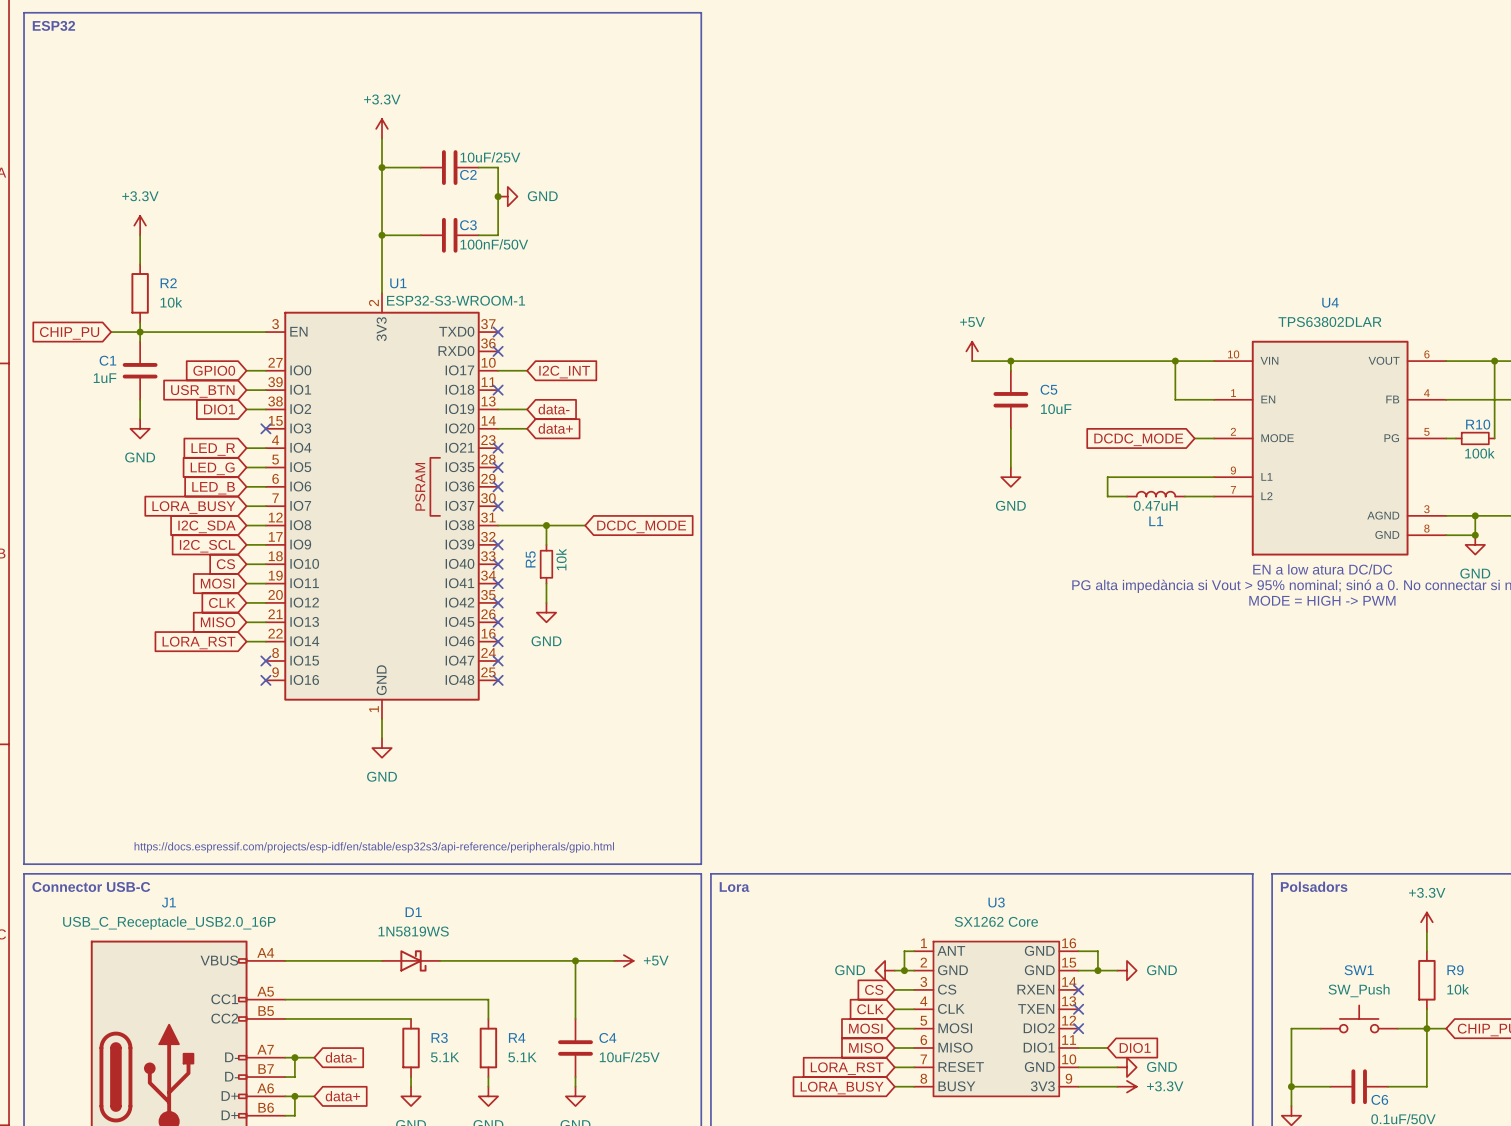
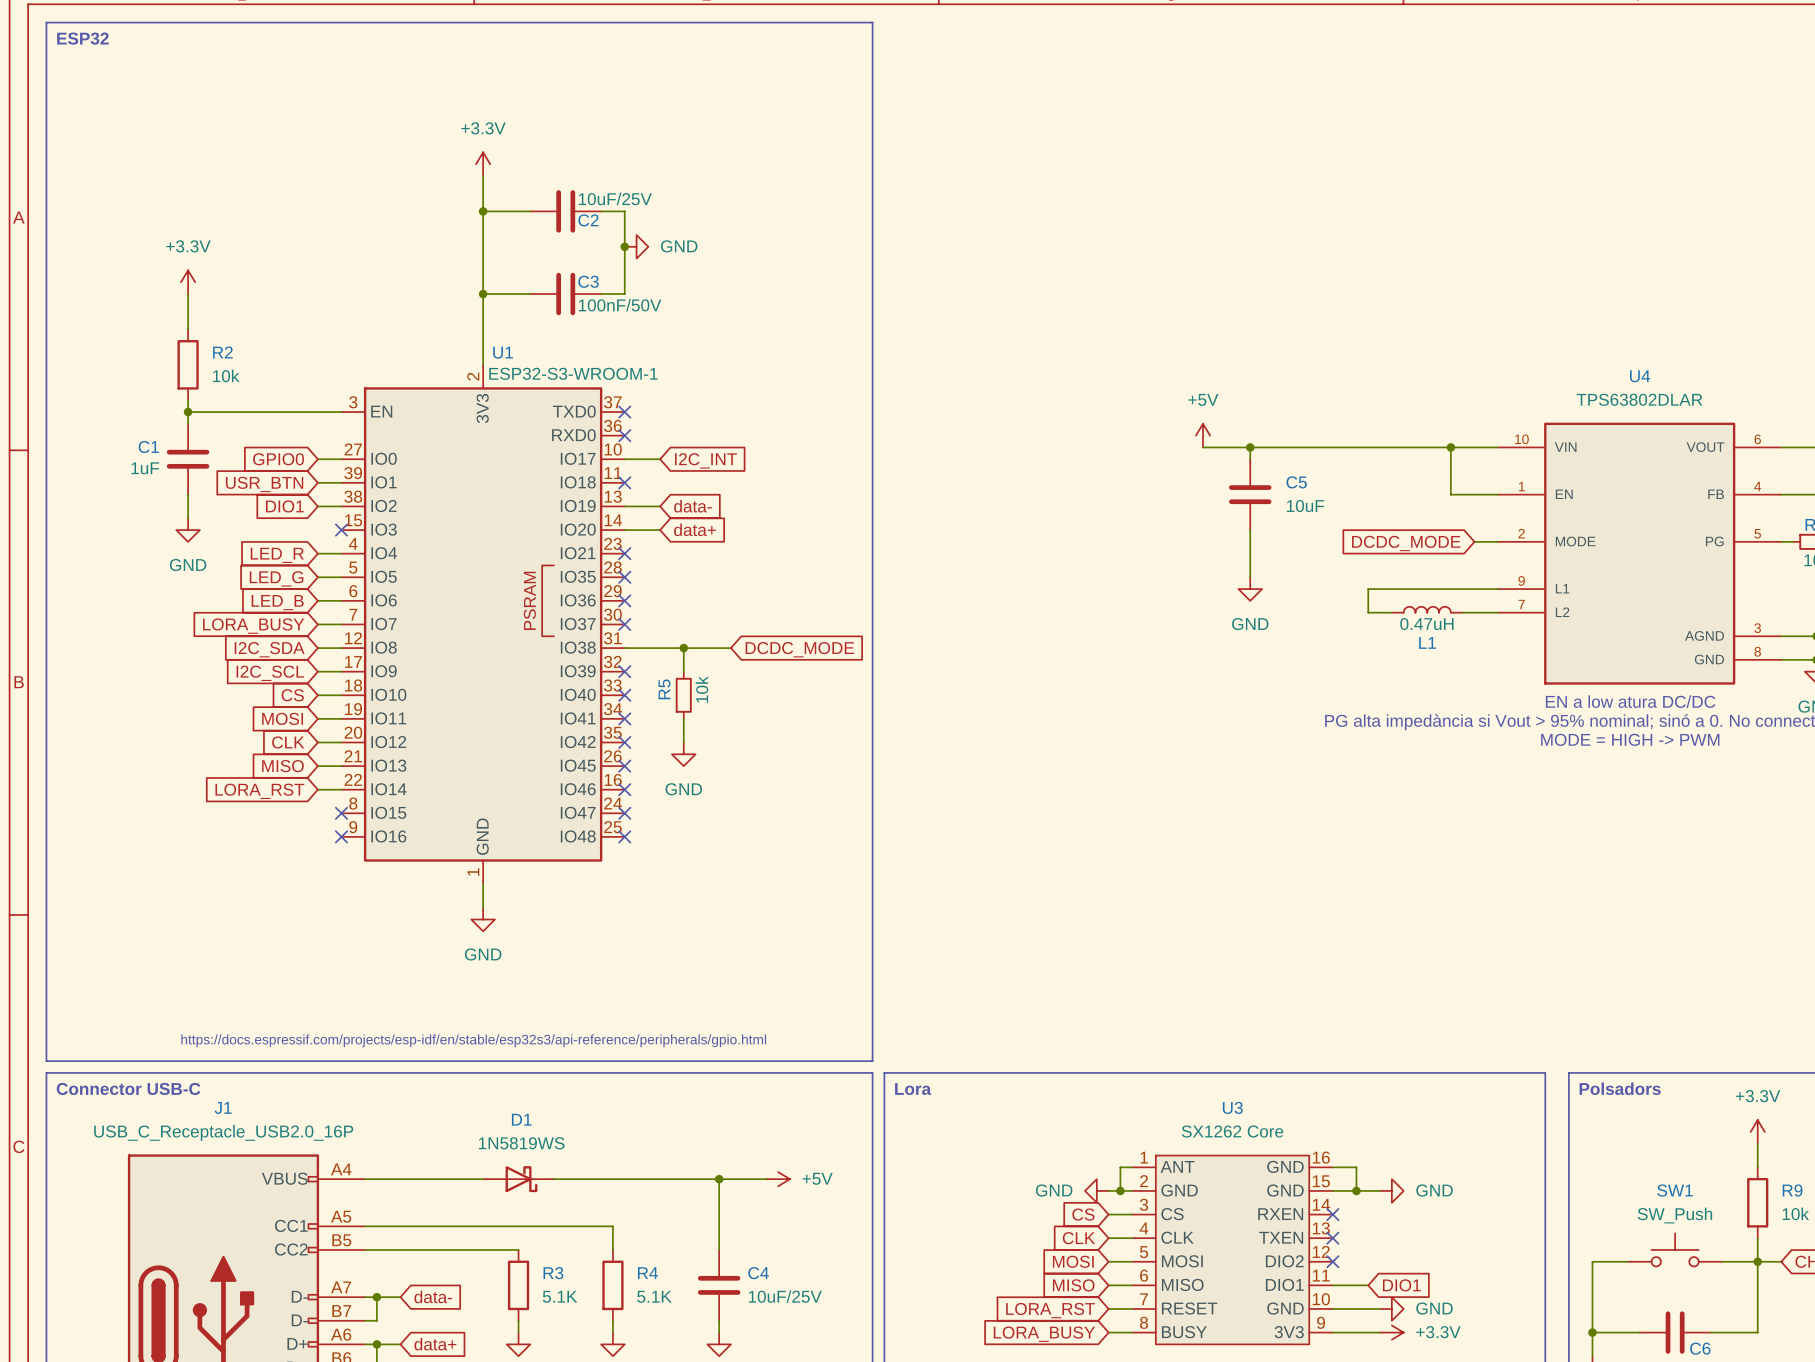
wire: (111, 332) (140, 332) -> none
global label: CHIP_PU (69, 333) -> none

